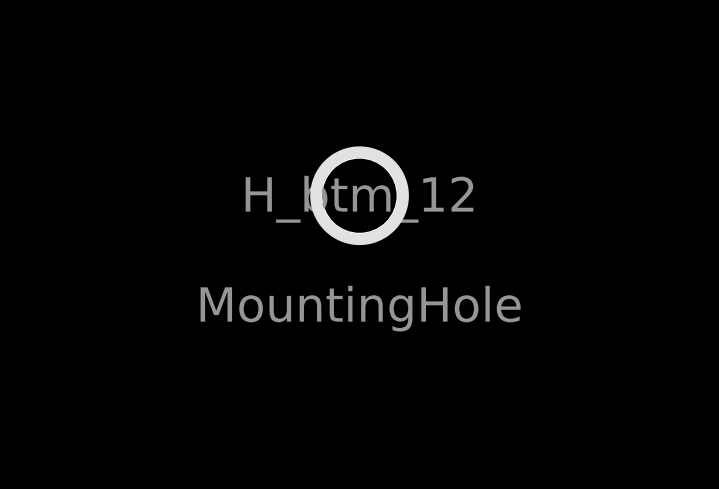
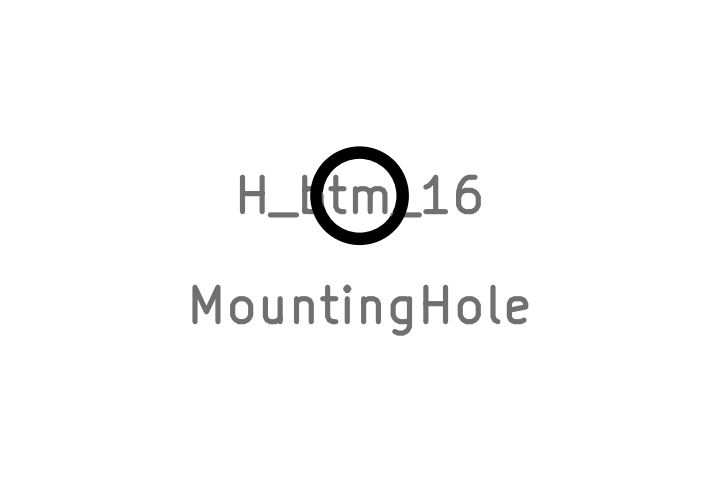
H_btm_12 name: H_btm_12 (359, 199) -> H_btm_16 (360, 196)

